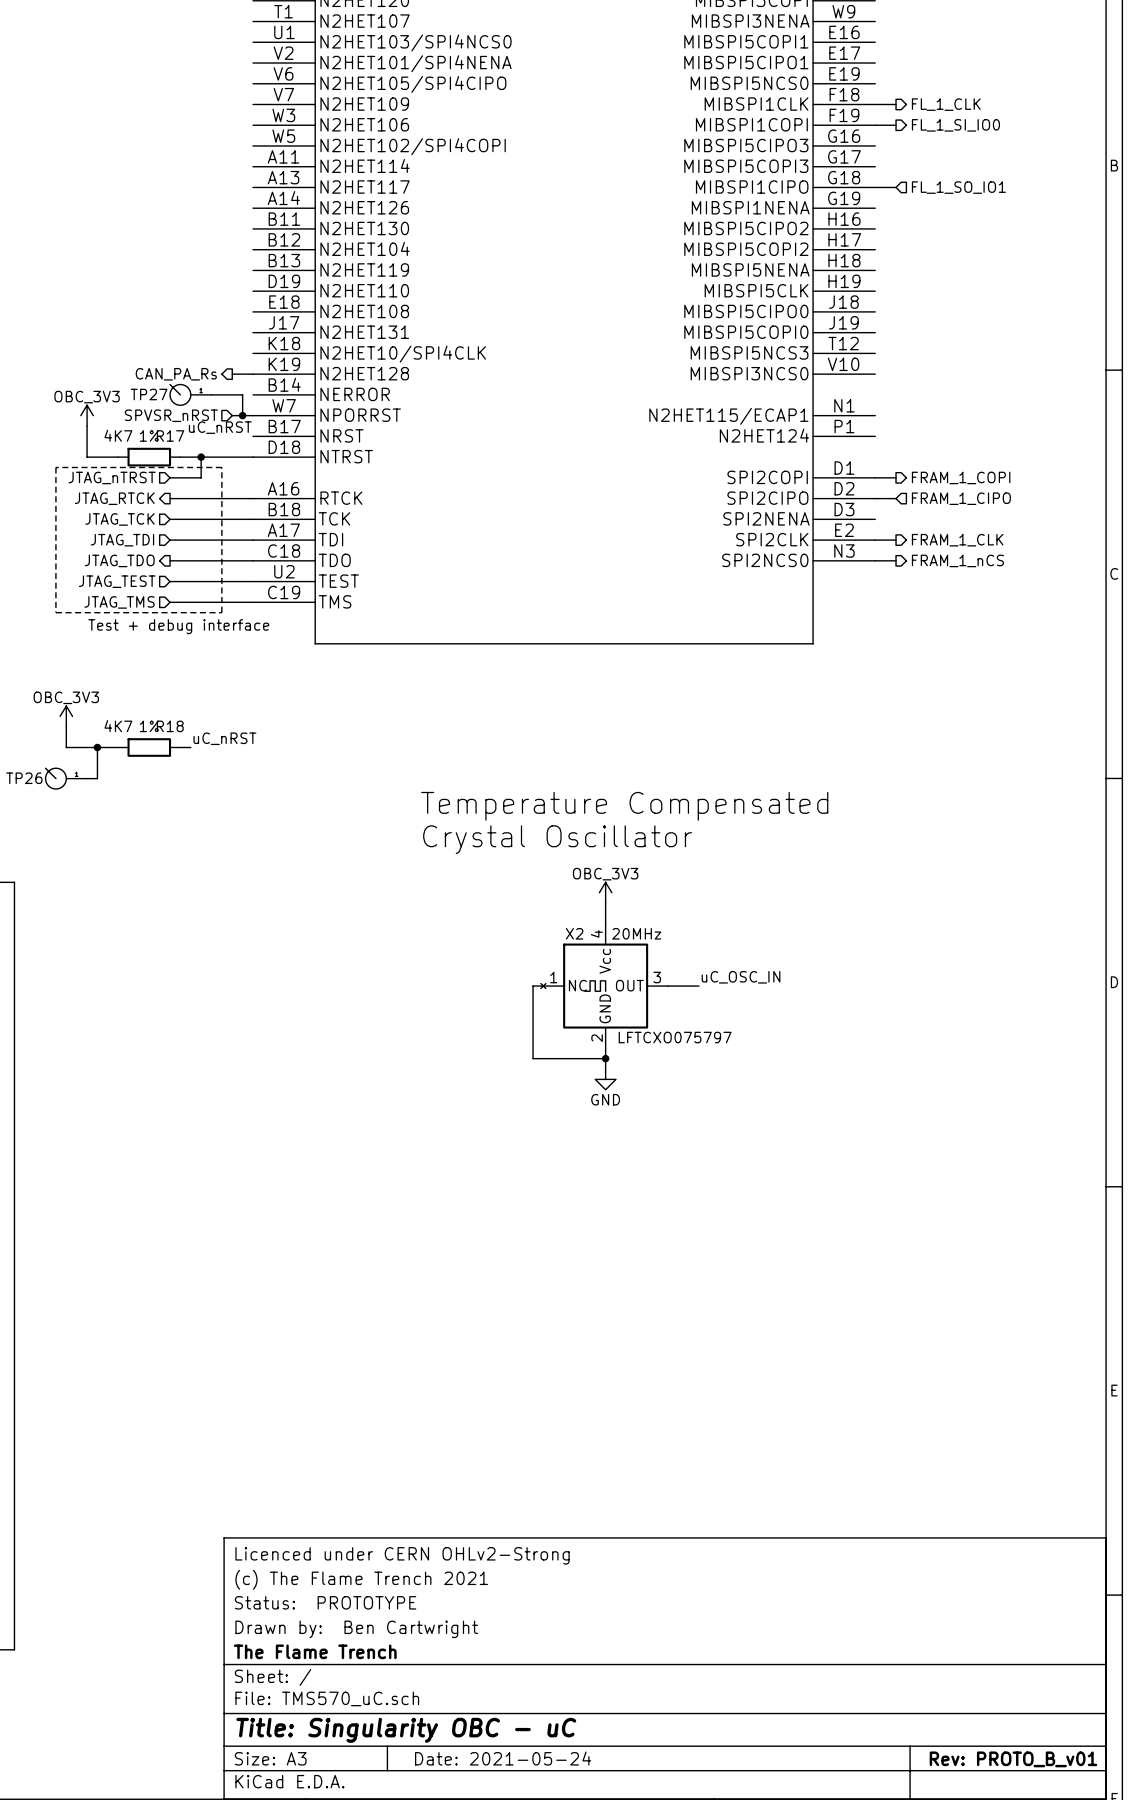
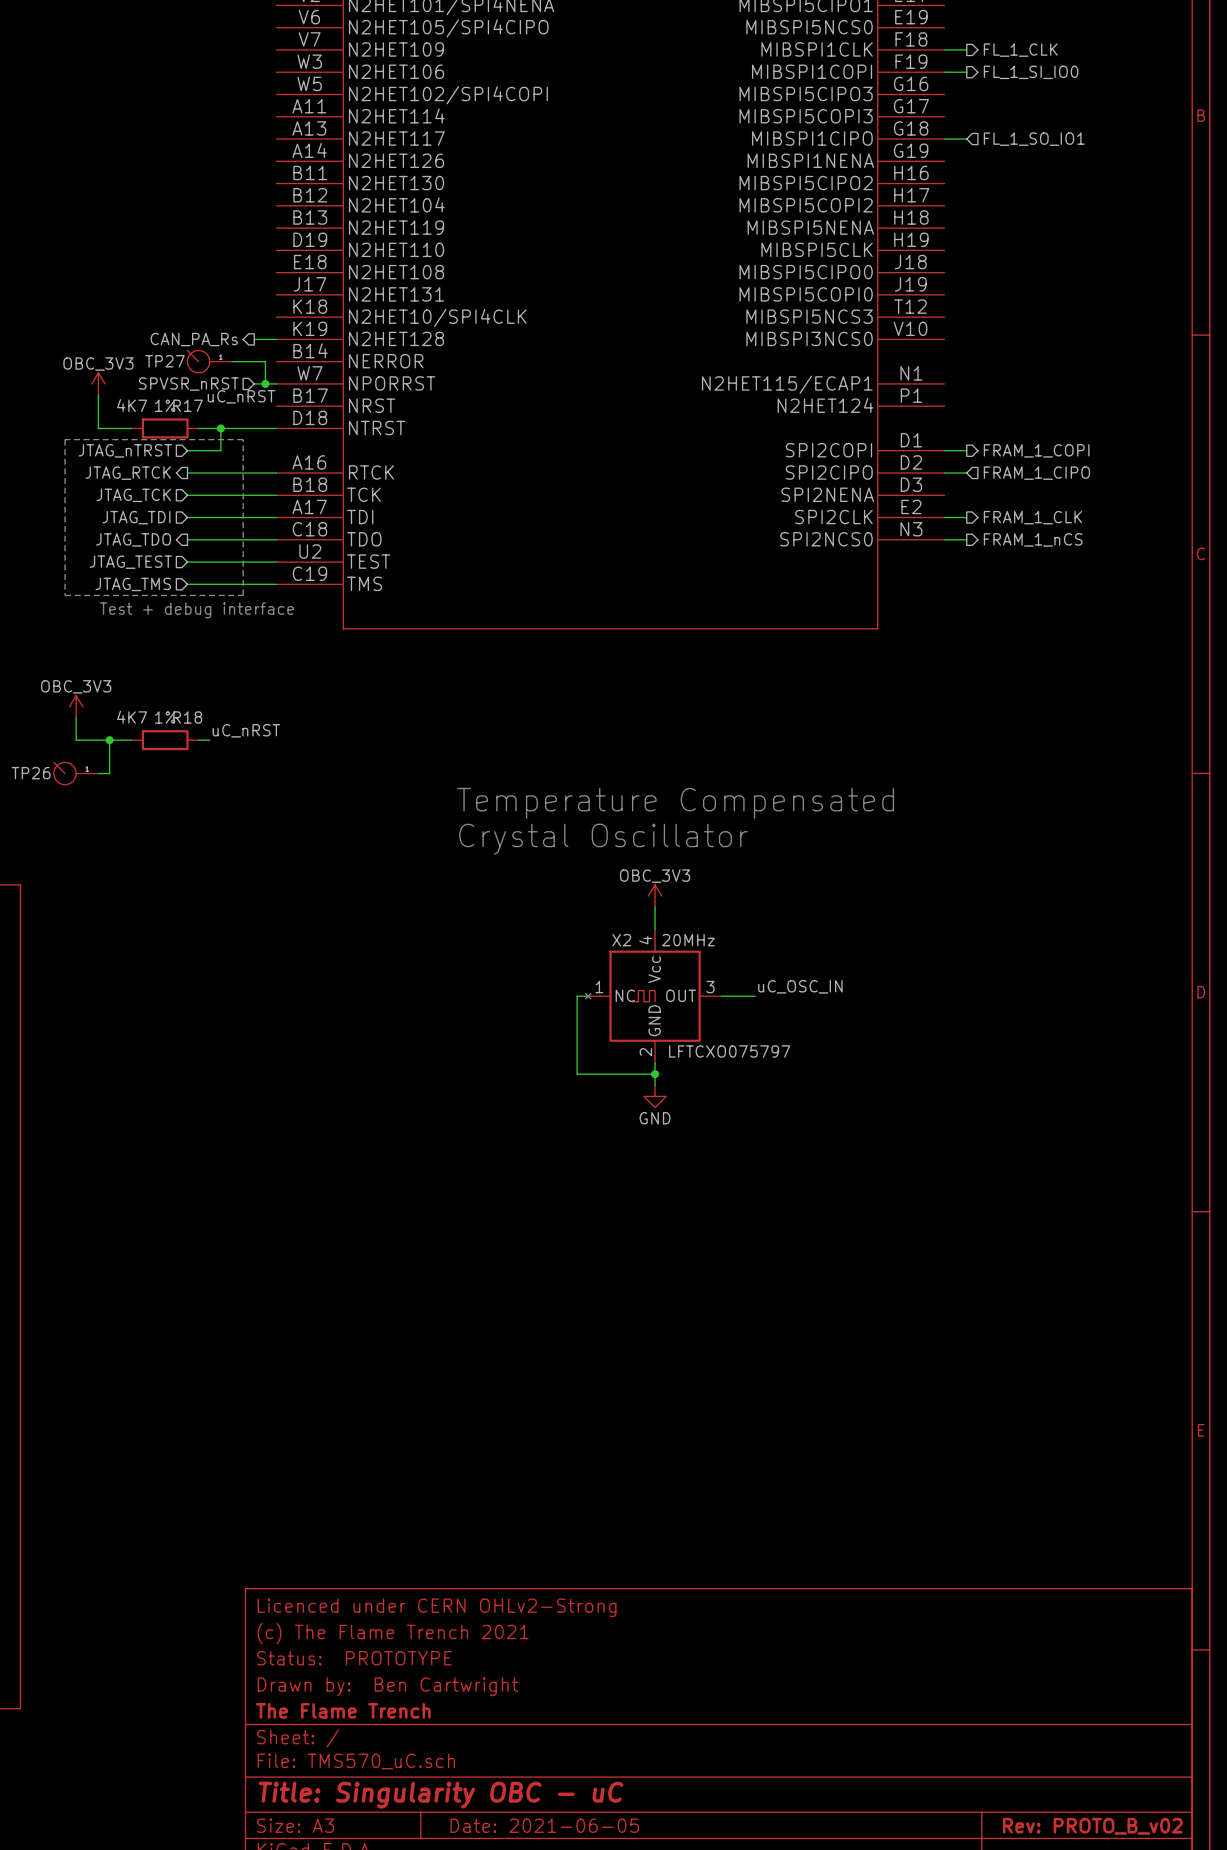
title block: Date: 2021-05-24 (503, 1758) -> Date: 2021-06-05 (544, 1825)
title block: Rev: PROTO_B_v01 (1013, 1759) -> Rev: PROTO_B_v02 (1092, 1826)

